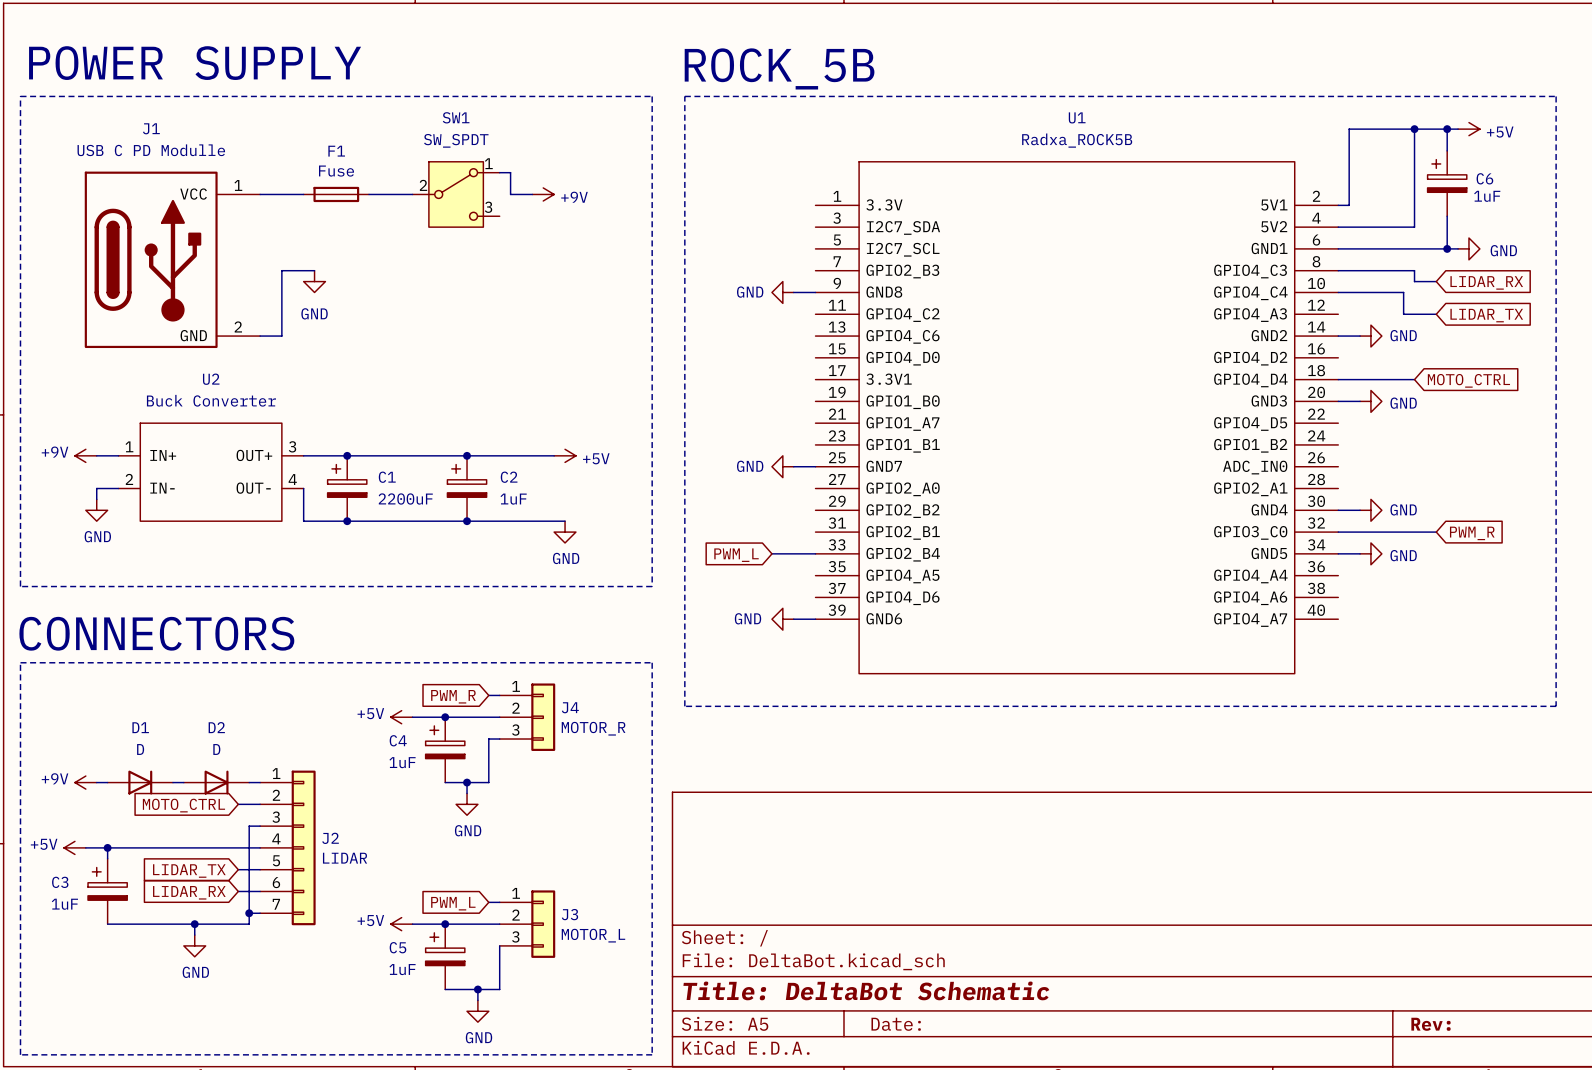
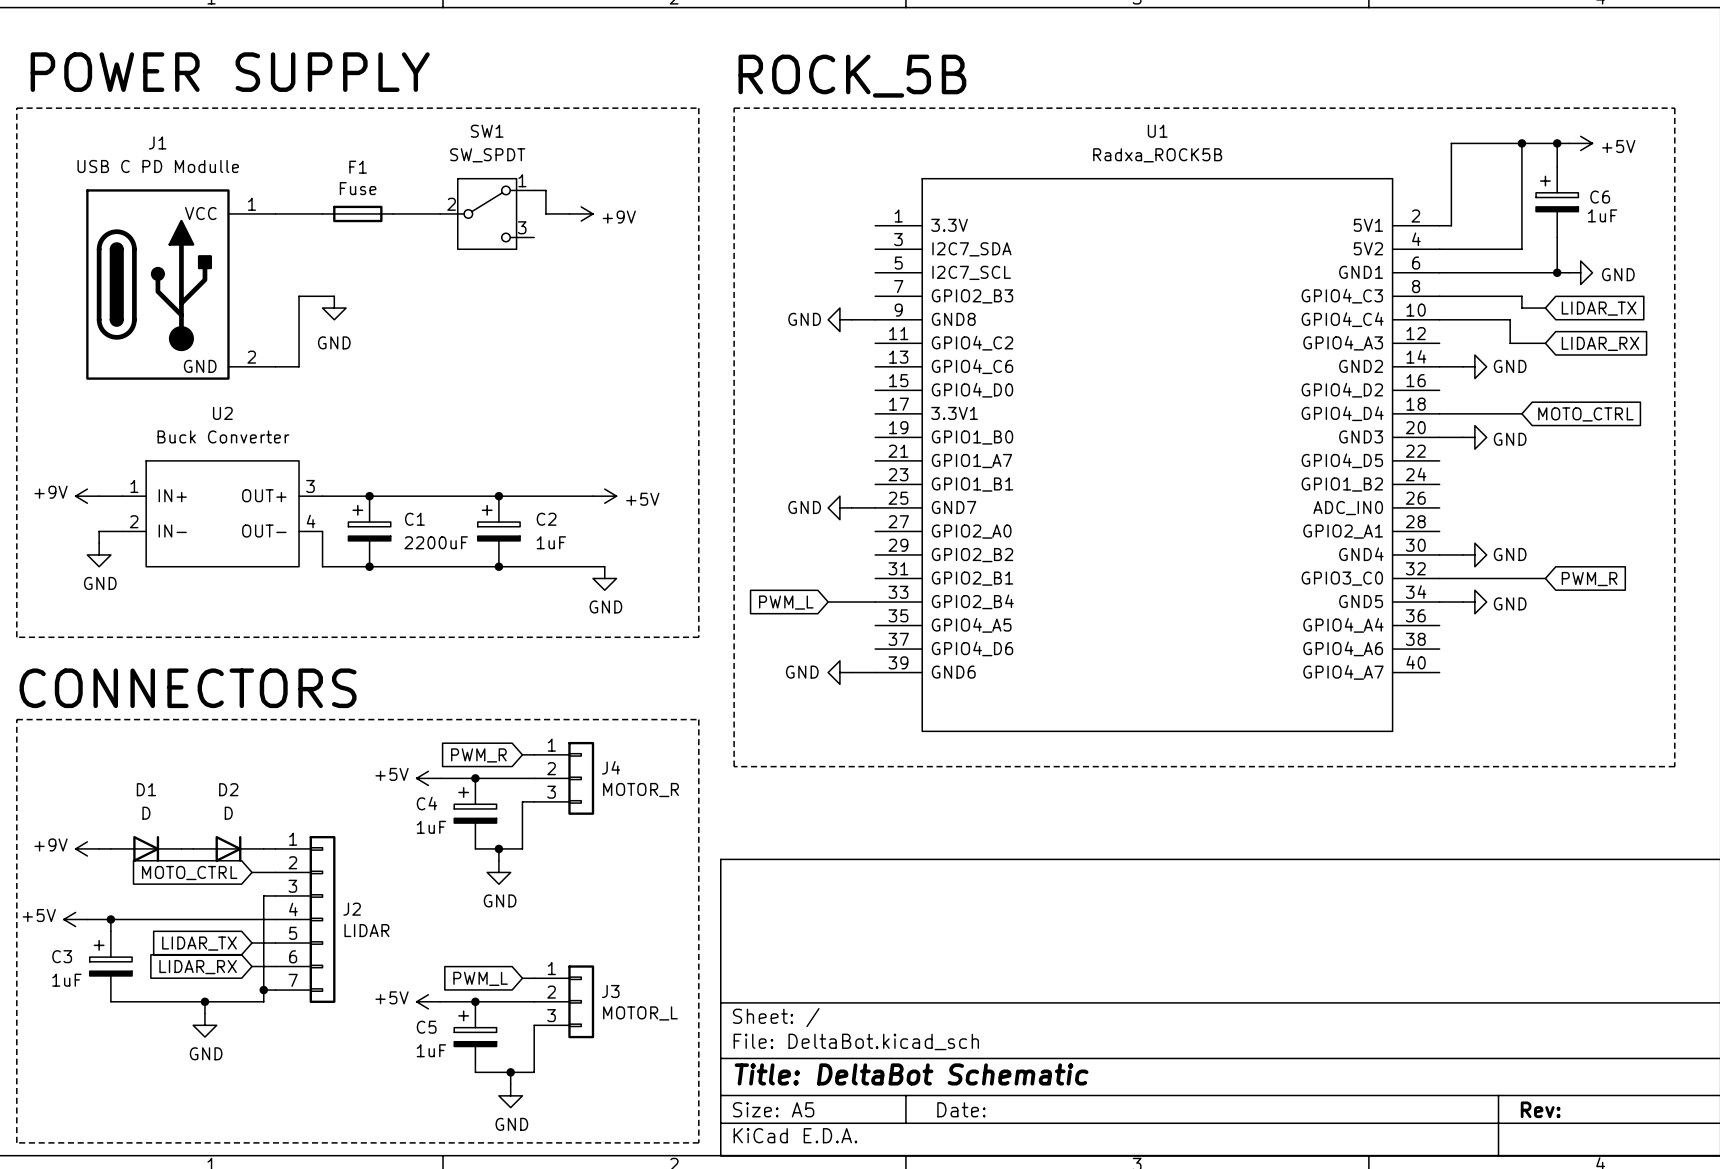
global label: LIDAR_RX (1486, 282) -> LIDAR_TX (1599, 308)
global label: LIDAR_TX (1486, 315) -> LIDAR_RX (1600, 343)

